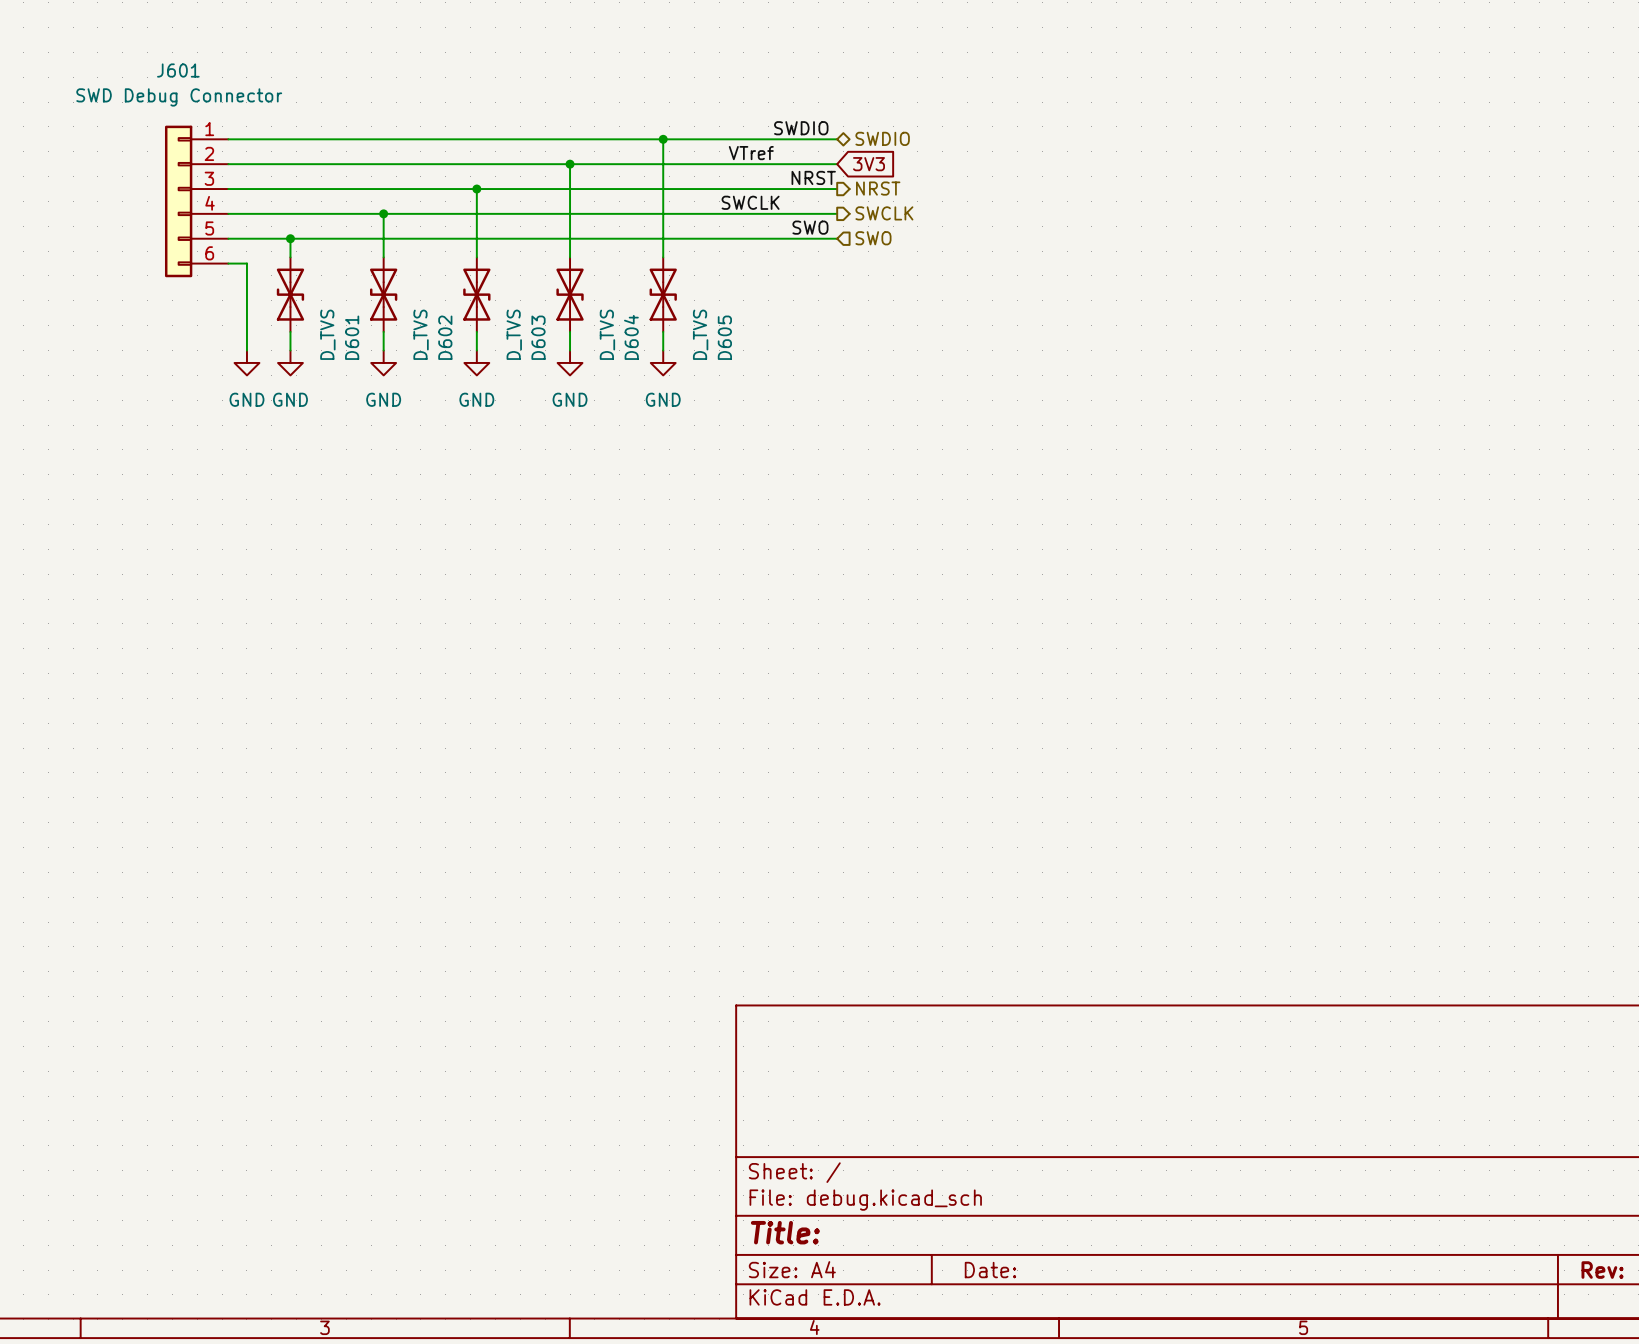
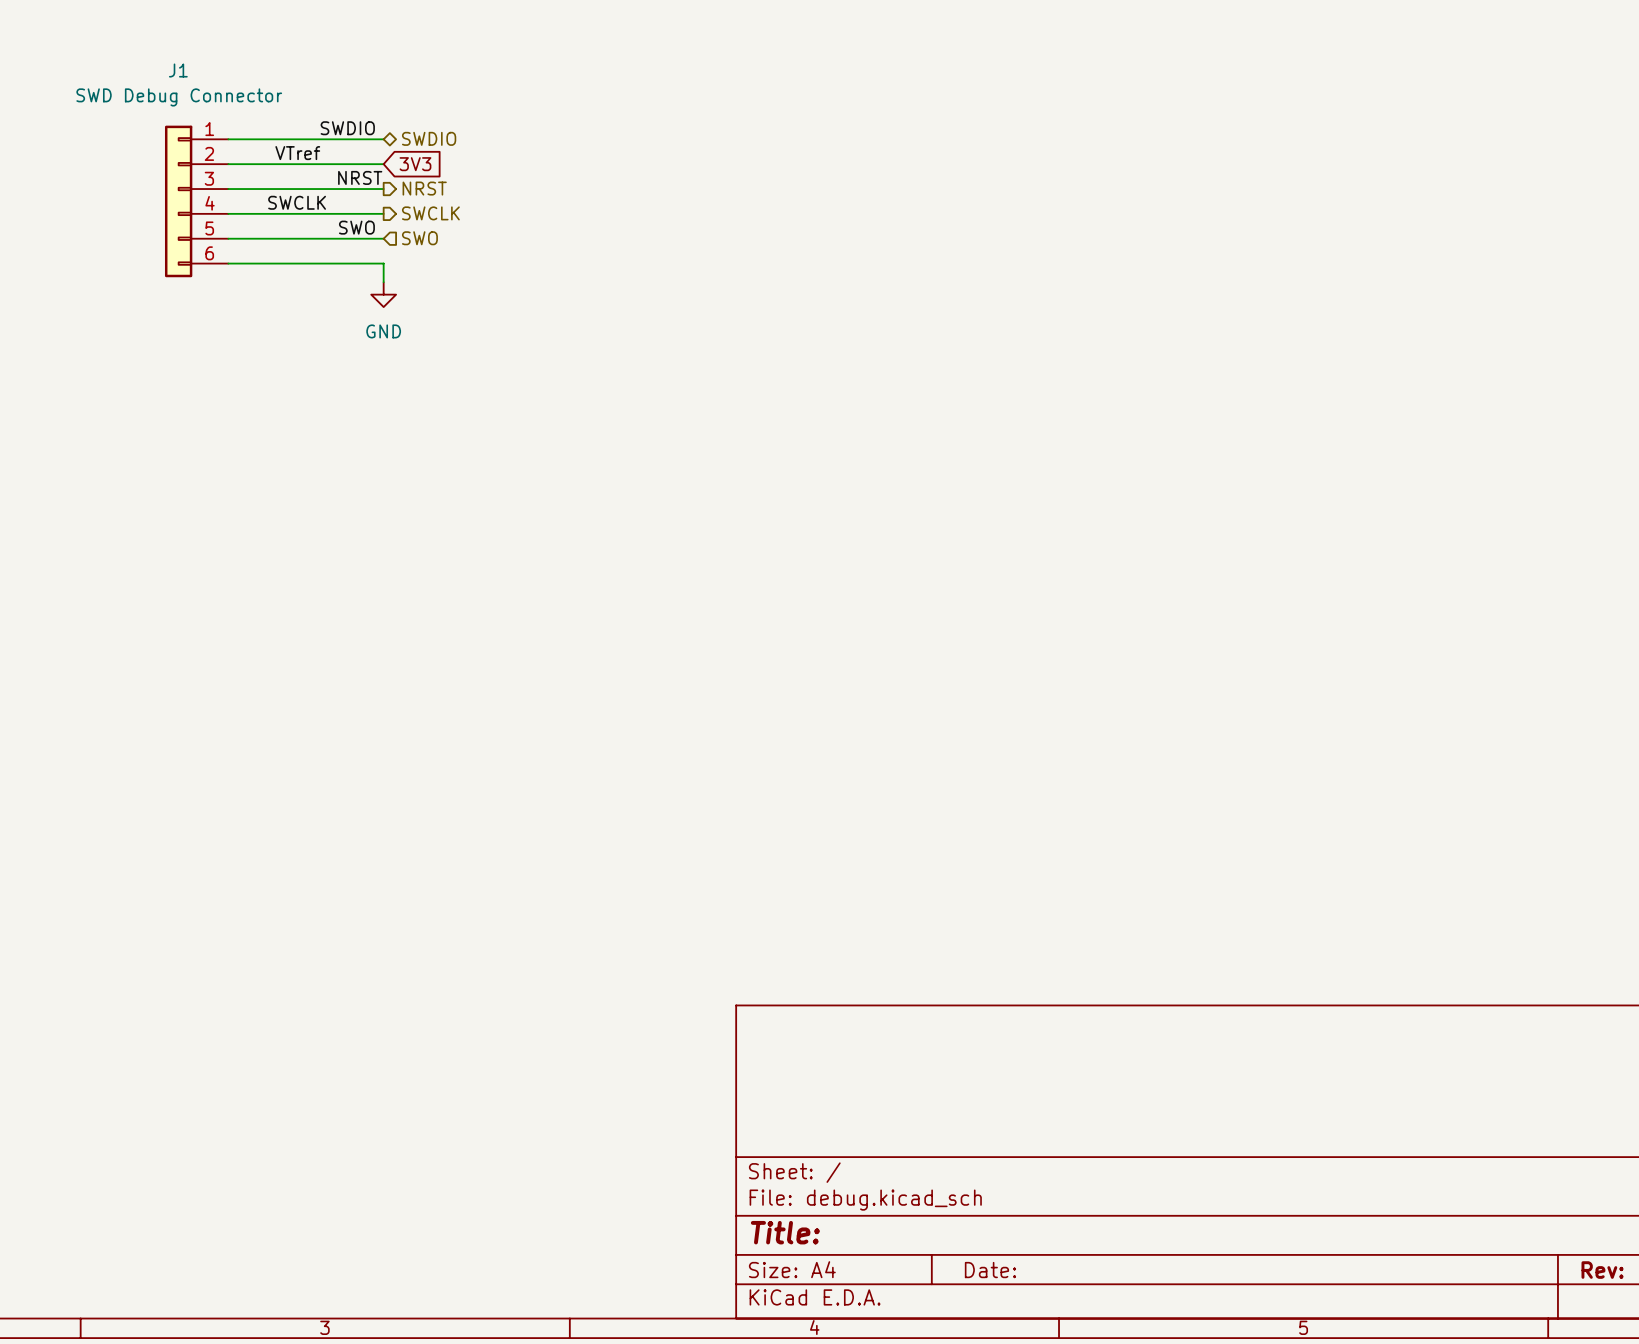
J601 name: J601 (178, 70) -> J1 (178, 70)
label: none -> SWDIO (347, 128)
label: SWDIO (801, 128) -> none
hierarchical label: none -> SWDIO (429, 138)
hierarchical label: SWDIO (882, 138) -> none
wire: (383, 139) (837, 139) -> none
wire: (663, 139) (663, 257) -> none
junction: (663, 139) -> none
label: none -> VTref (297, 153)
label: VTref (751, 153) -> none
wire: (383, 164) (837, 164) -> none
global label: none -> 3V3 (415, 164)
wire: (570, 164) (570, 257) -> none
junction: (570, 164) -> none
global label: 3V3 (868, 164) -> none
label: none -> NRST (360, 177)
label: NRST (813, 177) -> none
hierarchical label: none -> NRST (424, 188)
hierarchical label: NRST (878, 188) -> none
wire: (383, 189) (837, 189) -> none
wire: (476, 189) (476, 257) -> none
junction: (476, 189) -> none
label: none -> SWCLK (297, 202)
label: SWCLK (750, 202) -> none
junction: (383, 213) -> none
hierarchical label: none -> SWCLK (430, 213)
wire: (837, 213) (383, 213) (383, 257) -> none
hierarchical label: SWCLK (884, 213) -> none
label: none -> SWO (356, 227)
label: SWO (810, 227) -> none
wire: (290, 238) (290, 257) -> none
junction: (290, 238) -> none
wire: (383, 238) (837, 238) -> none
hierarchical label: none -> SWO (419, 238)
hierarchical label: SWO (873, 238) -> none
wire: (246, 263) (246, 350) -> (246, 263) (383, 263) (383, 282)
D601: D_TVS (290, 294) -> none
power symbol: none -> GND (383, 294)
D602: D_TVS (383, 294) -> none
D603: D_TVS (476, 294) -> none
D604: D_TVS (570, 294) -> none
D605: D_TVS (663, 294) -> none
wire: (290, 331) (290, 350) -> none
wire: (383, 331) (383, 350) -> none
wire: (476, 331) (476, 350) -> none
wire: (570, 331) (570, 350) -> none
wire: (663, 331) (663, 350) -> none
power symbol: GND (246, 362) -> none
power symbol: GND (290, 362) -> none
power symbol: GND (383, 362) -> none
power symbol: GND (476, 362) -> none
power symbol: GND (570, 362) -> none
power symbol: GND (663, 362) -> none

